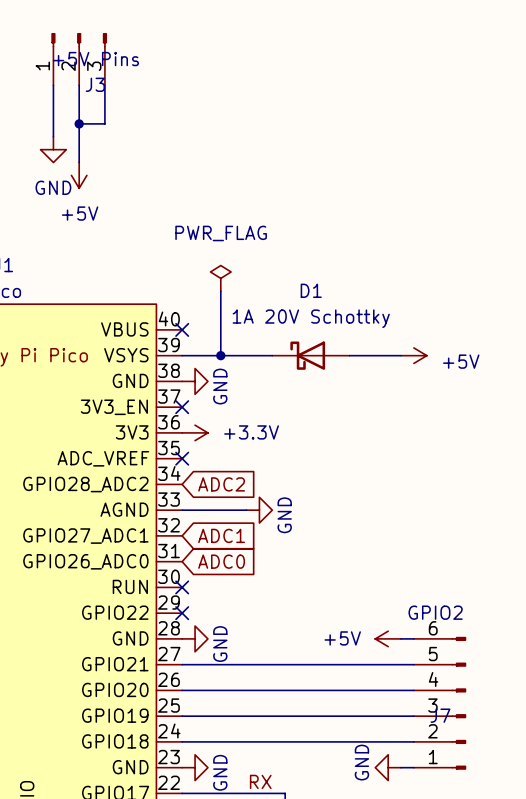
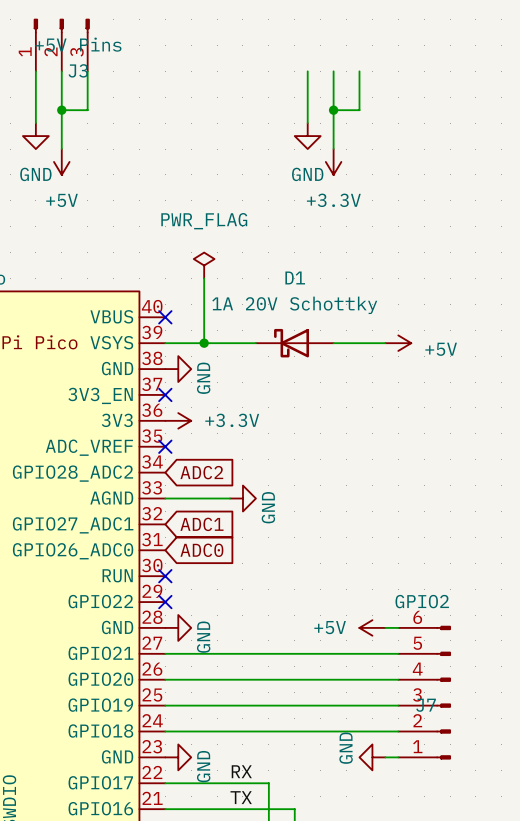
wire: none -> (307, 71) (307, 123)
wire: none -> (333, 71) (333, 149)
wire: none -> (359, 71) (359, 110) (333, 110)
junction: none -> (333, 110)
power symbol: none -> GND (307, 136)
power symbol: none -> +3.3V (333, 161)

